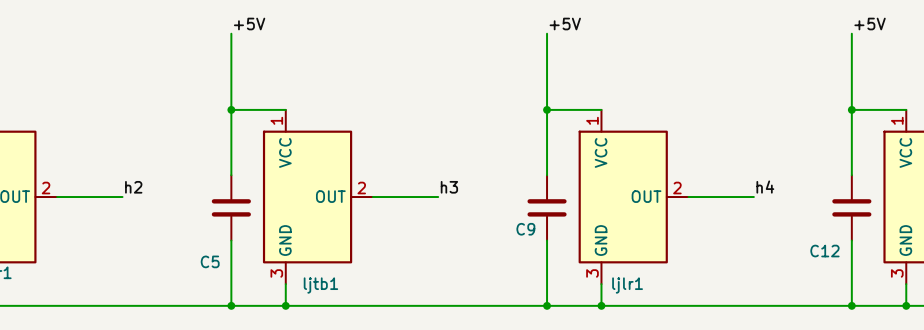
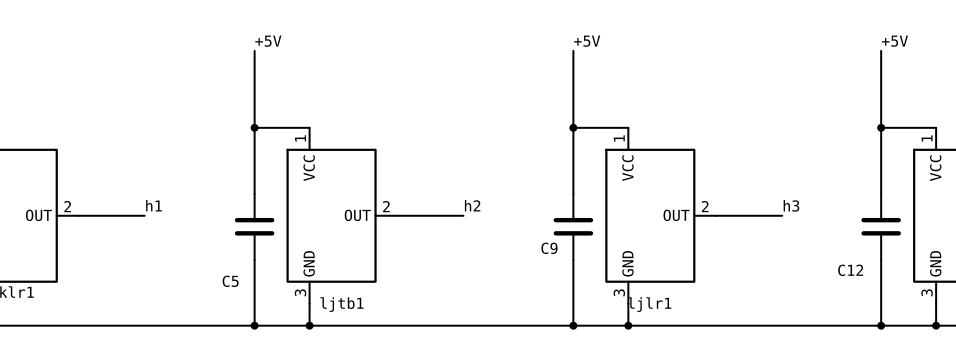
label: h2 (133, 187) -> h1 (153, 205)
label: h3 (449, 187) -> h2 (472, 205)
label: h4 (765, 187) -> h3 (791, 205)

